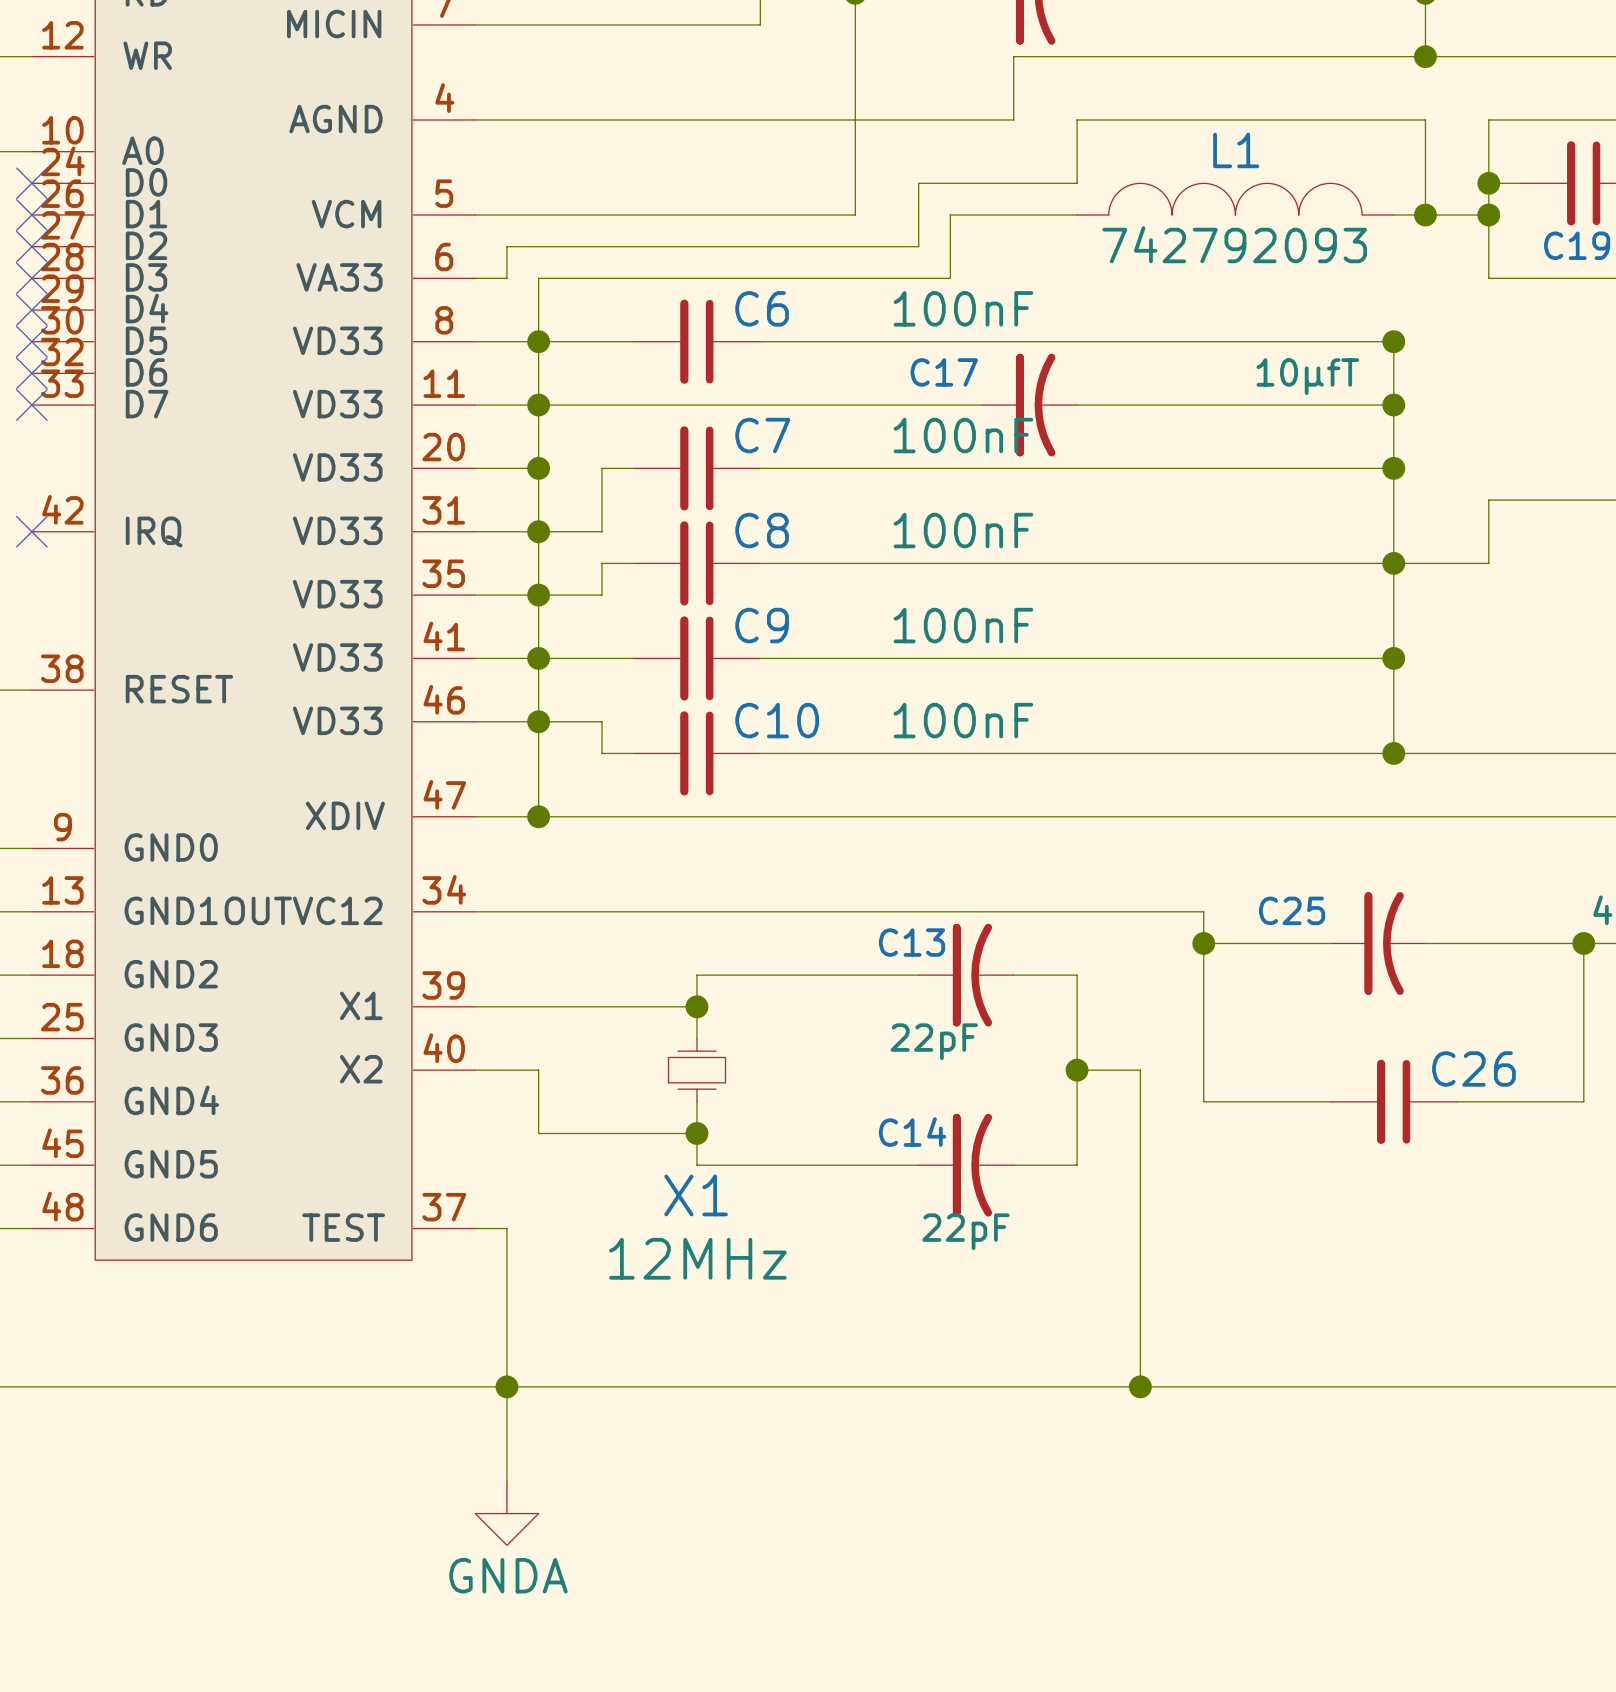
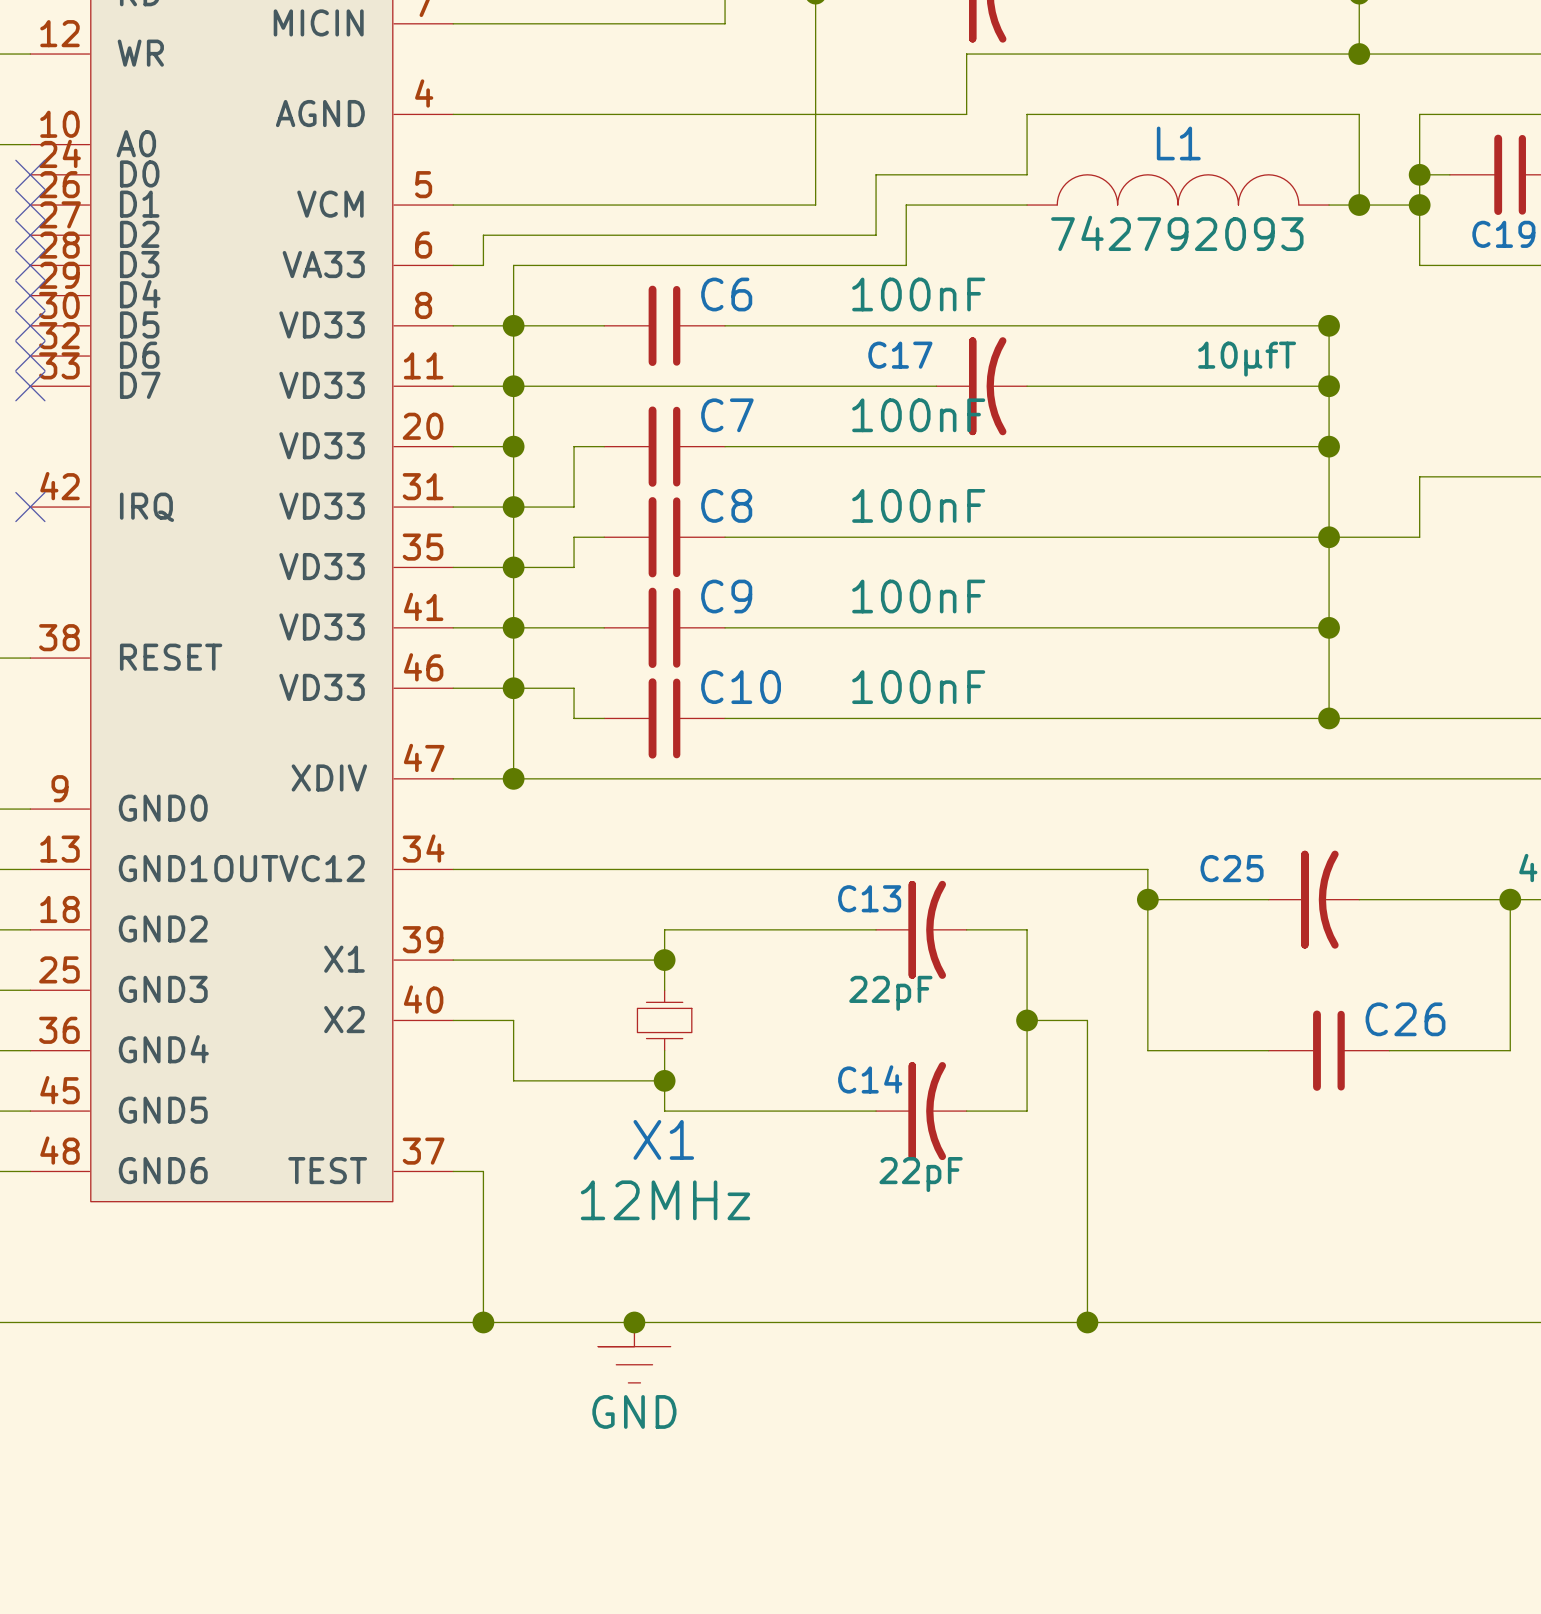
wire: (506, 1386) (506, 1481) -> none
junction: none -> (634, 1322)
power symbol: none -> GND (634, 1352)
power symbol: GNDA (506, 1513) -> none

